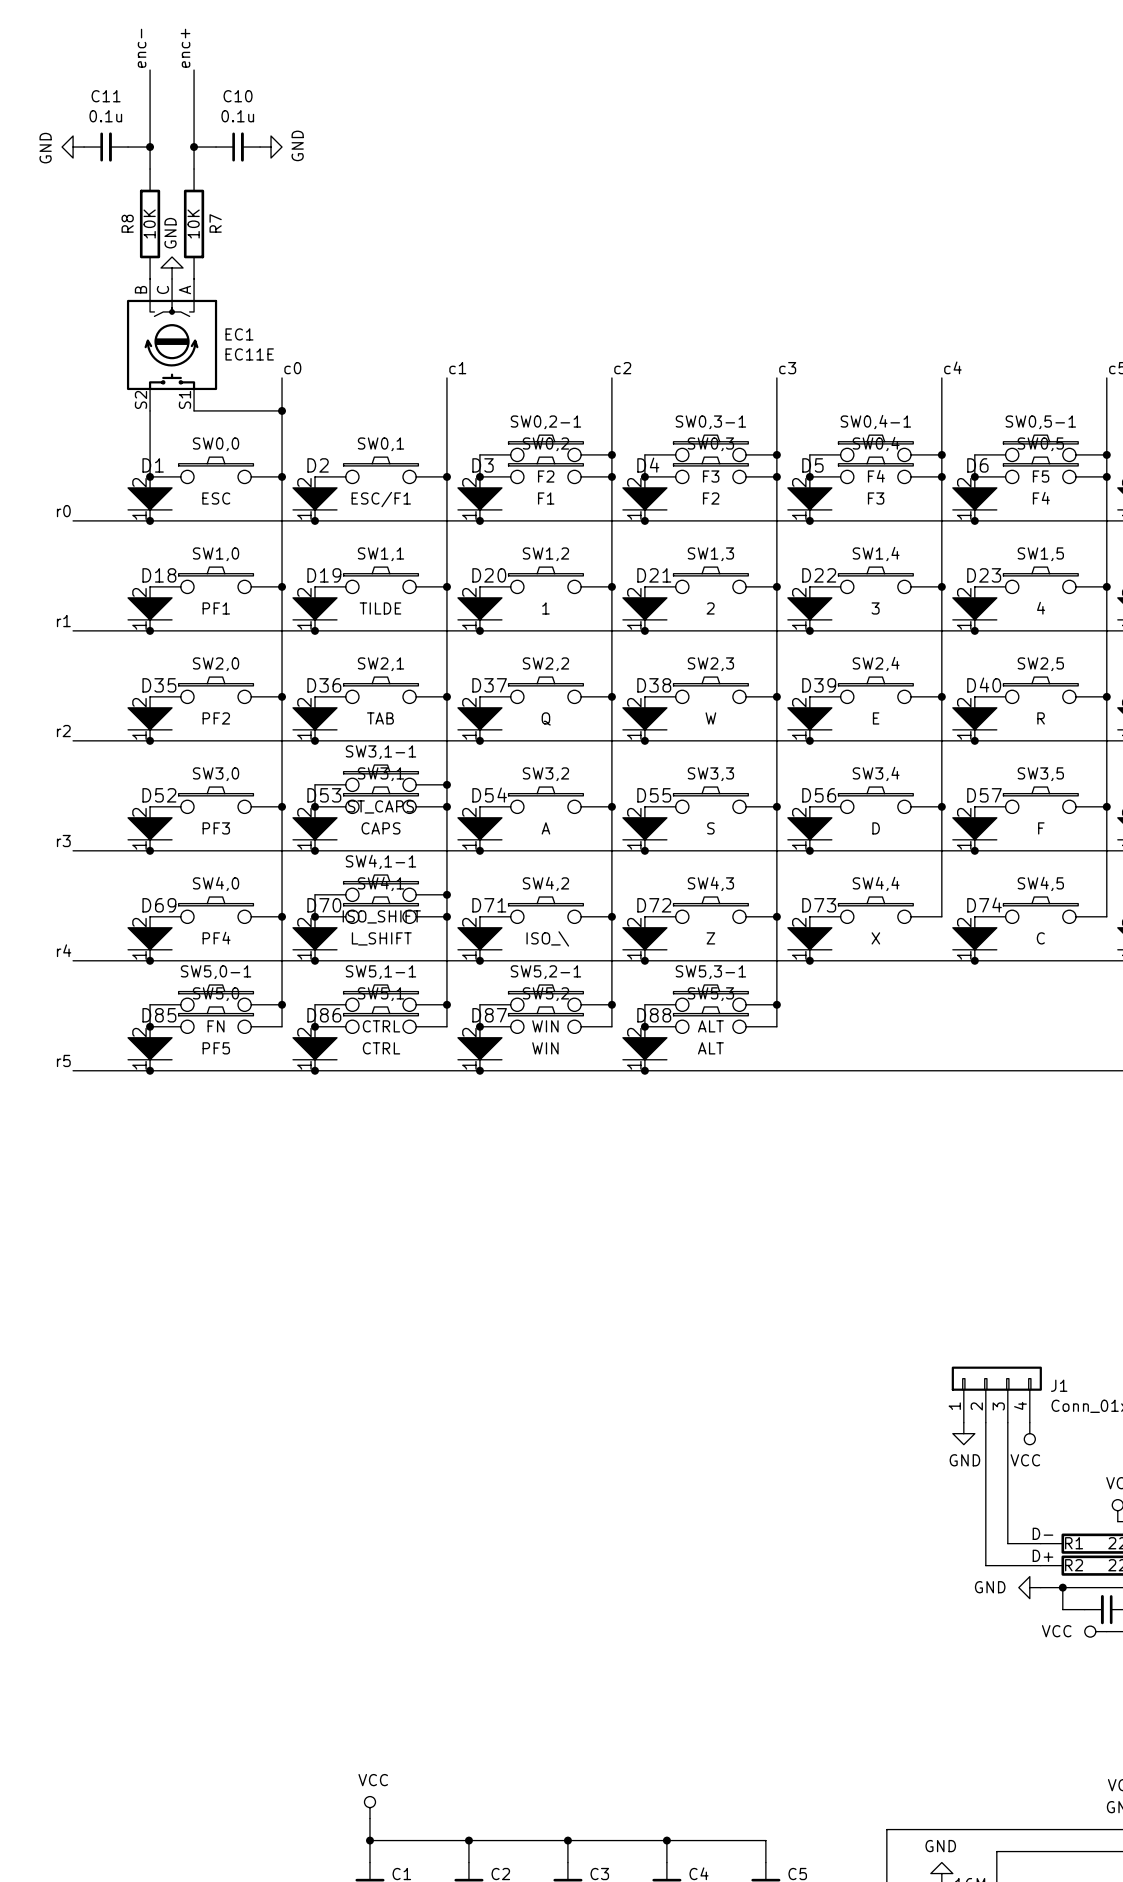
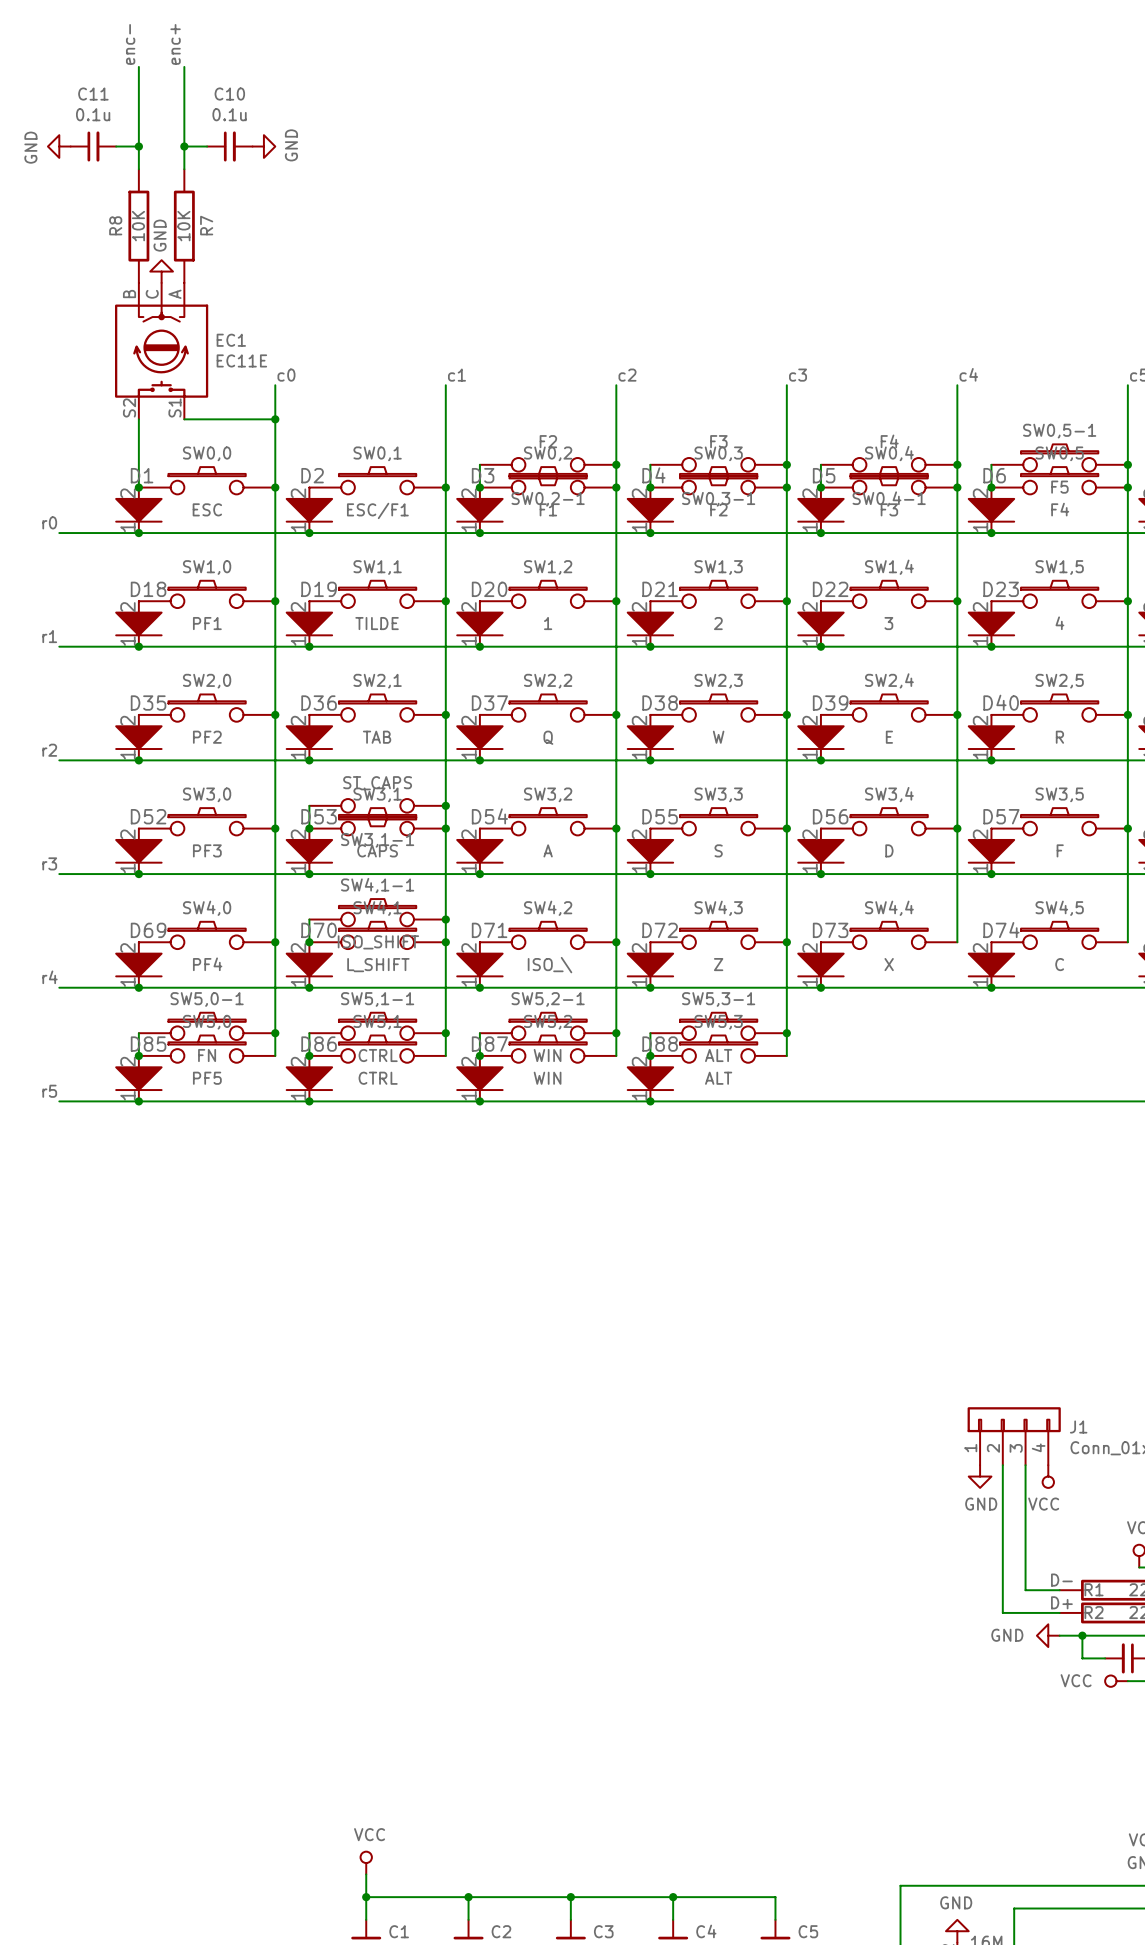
SW0,2-1 rotation: 0° (545, 439) -> 180° (548, 480)
SW0,3-1 rotation: 0° (710, 439) -> 180° (718, 480)
SW0,4-1 rotation: 0° (875, 439) -> 180° (889, 480)
SW3,1-1 rotation: 0° (380, 769) -> 180° (377, 821)

